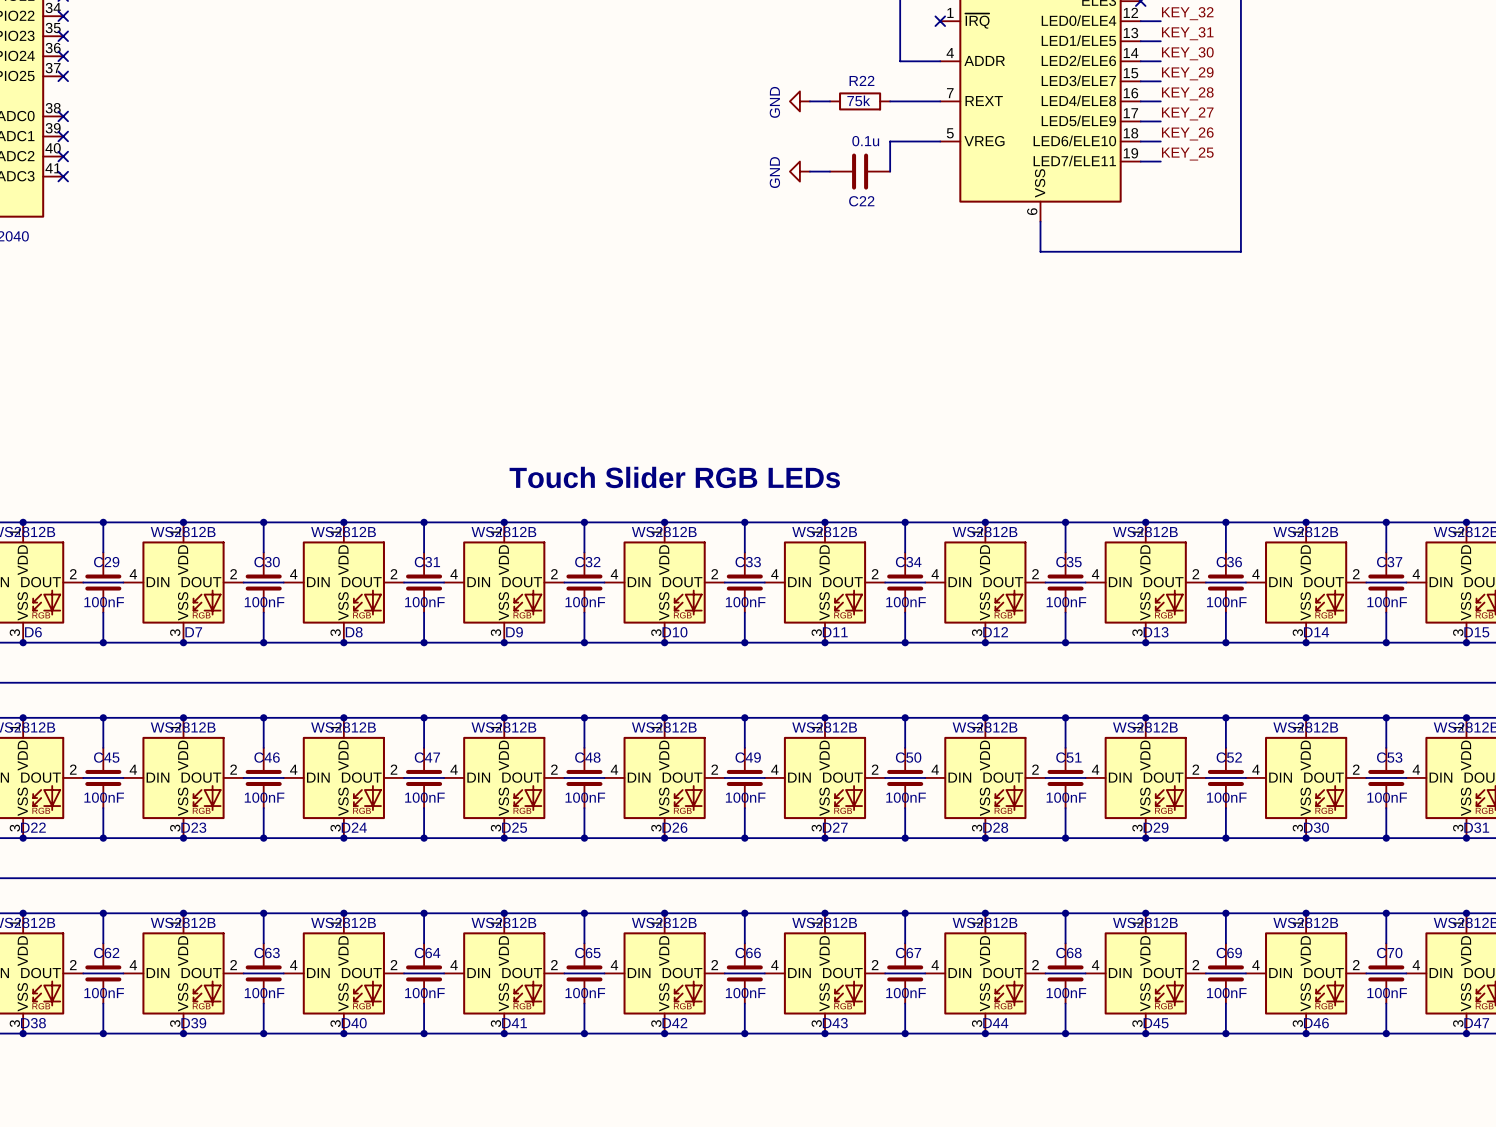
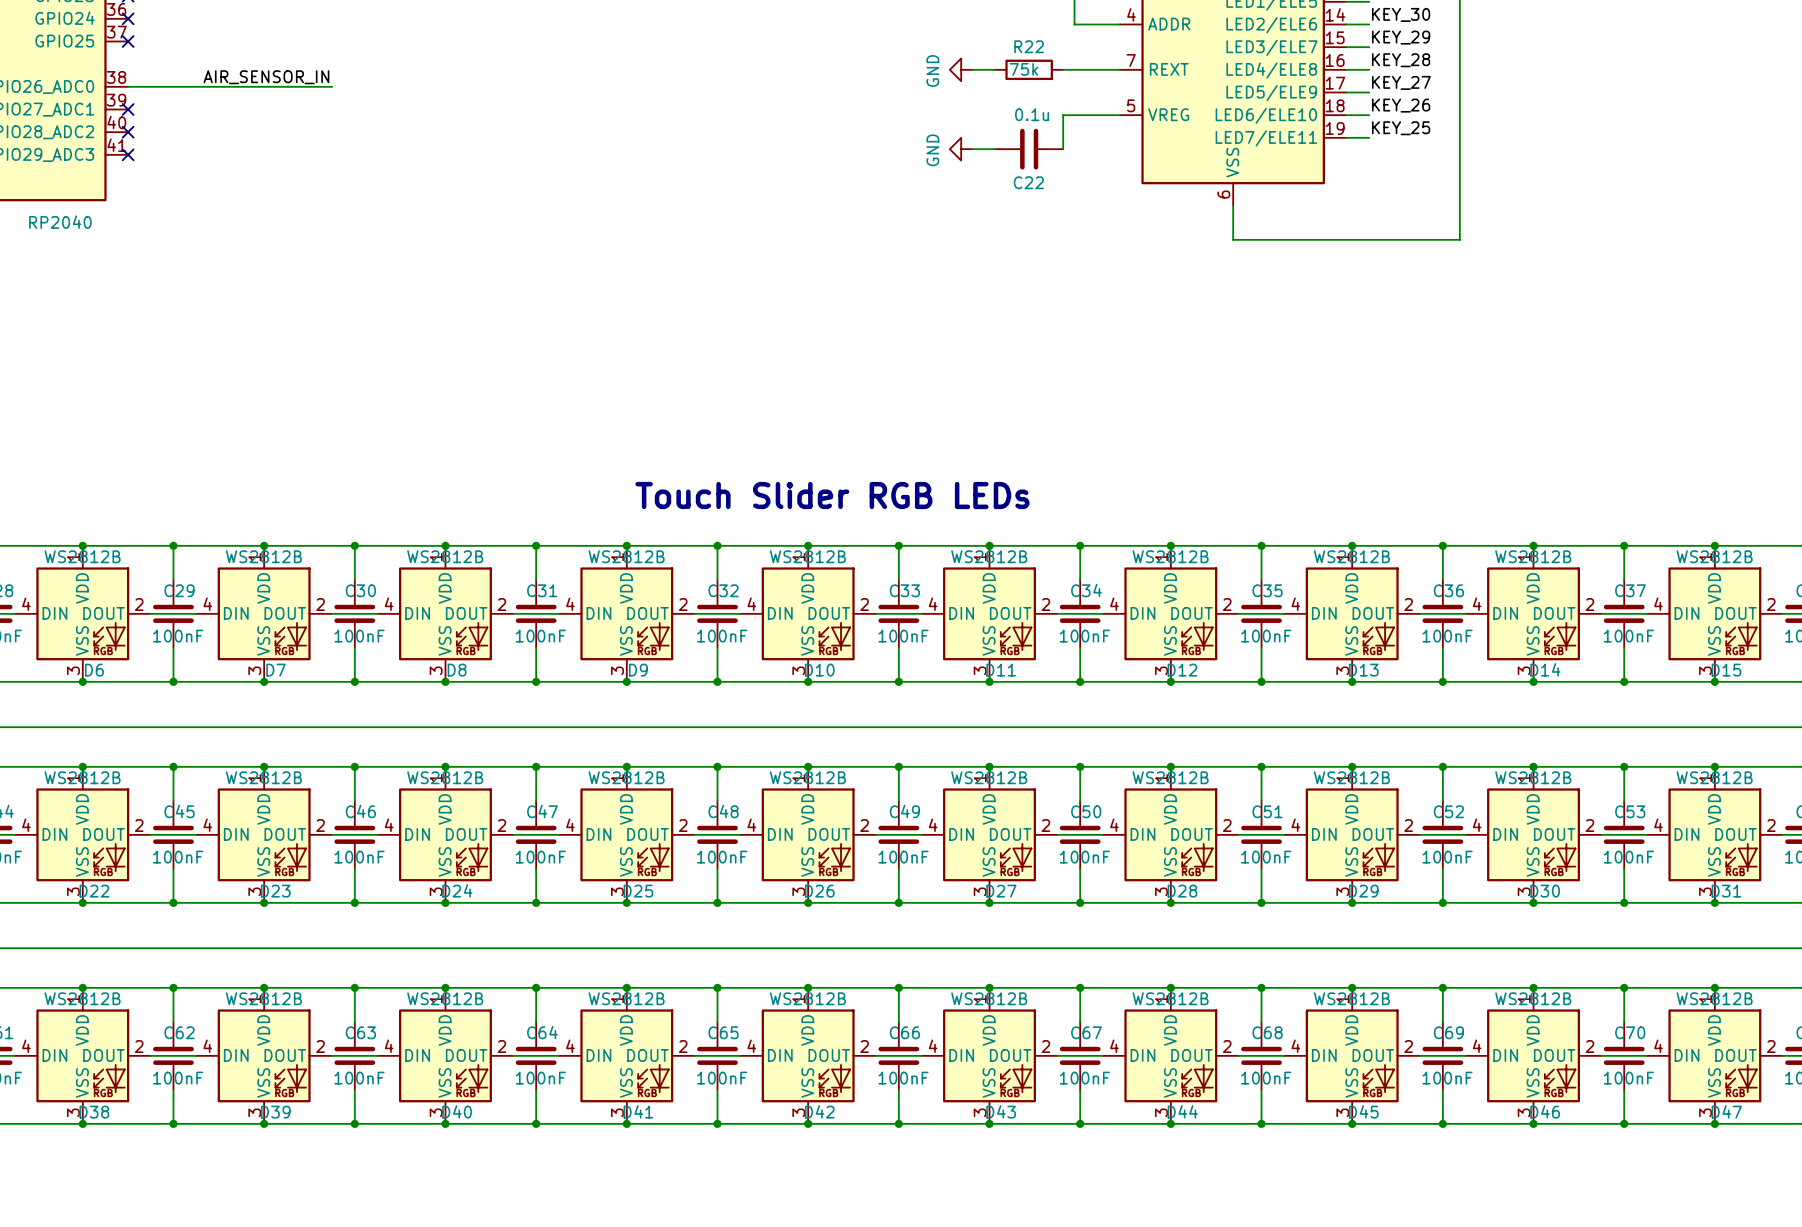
label: none -> AIR_SENSOR_IN (266, 77)
wire: none -> (128, 86) (332, 86)
no-connect mark: (63, 116) -> none

